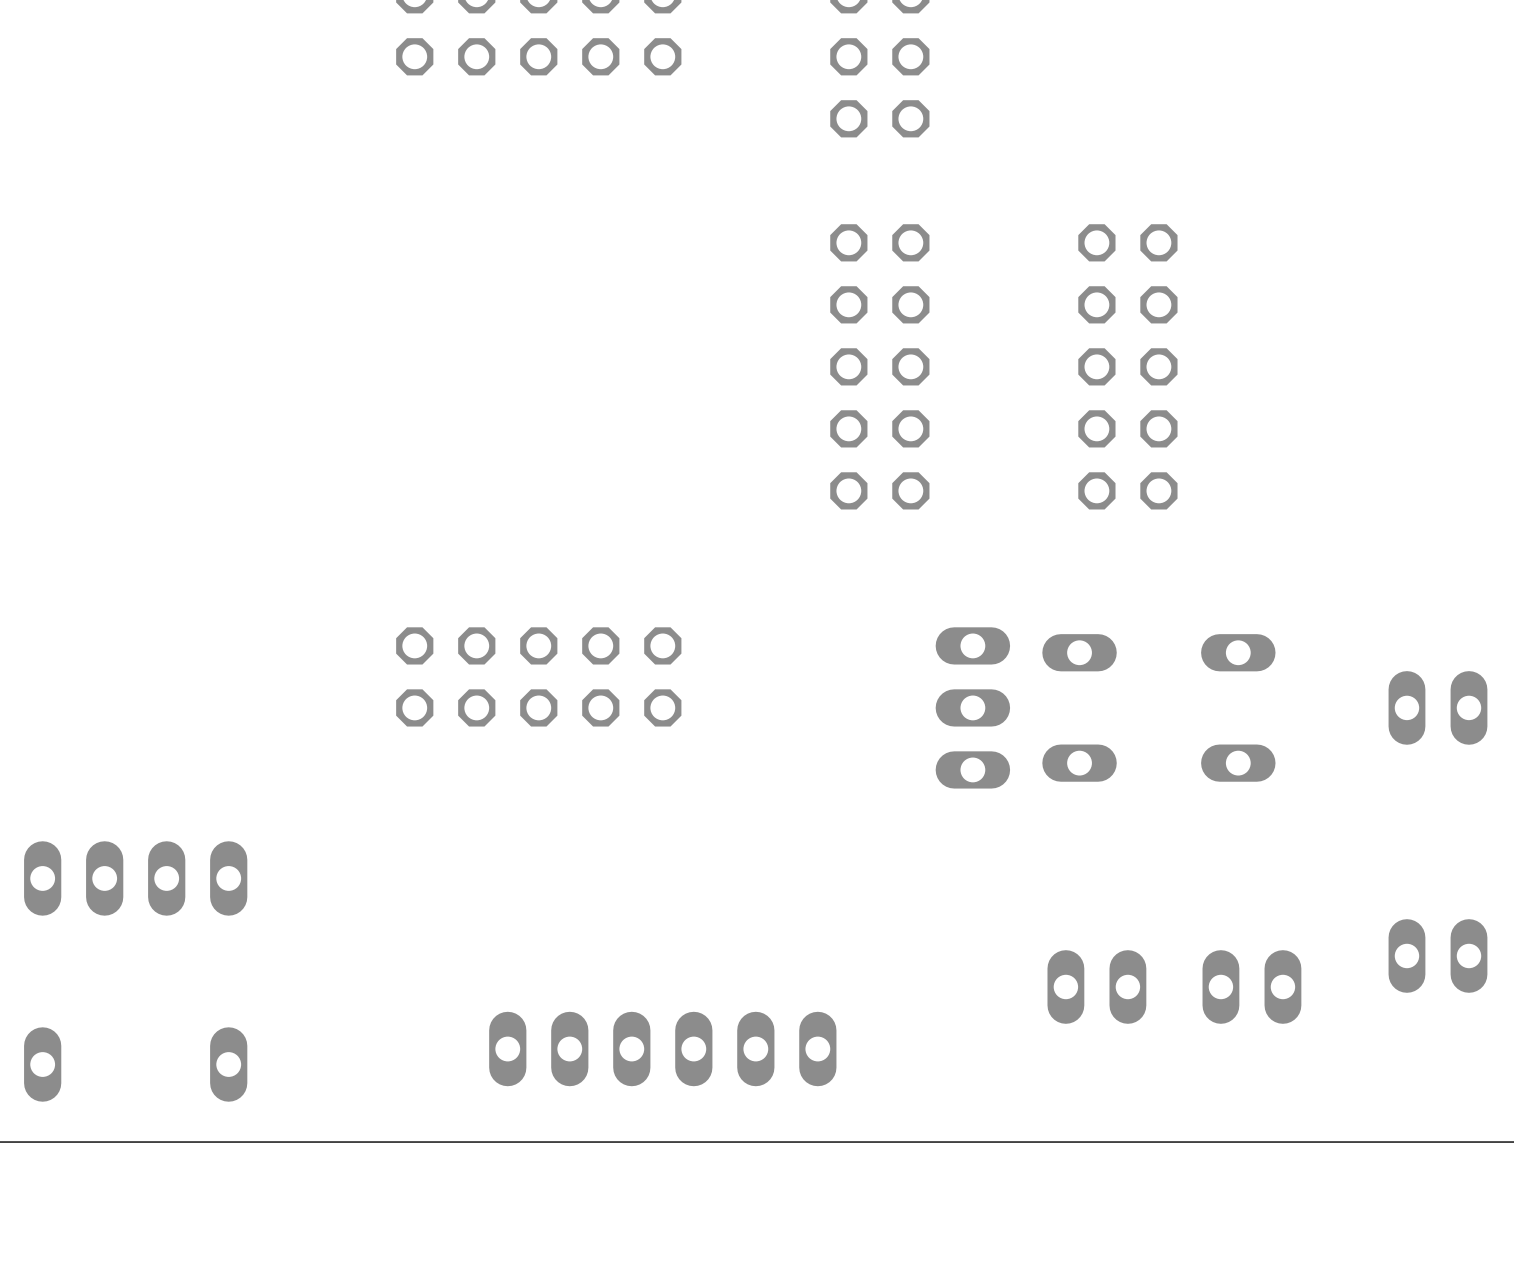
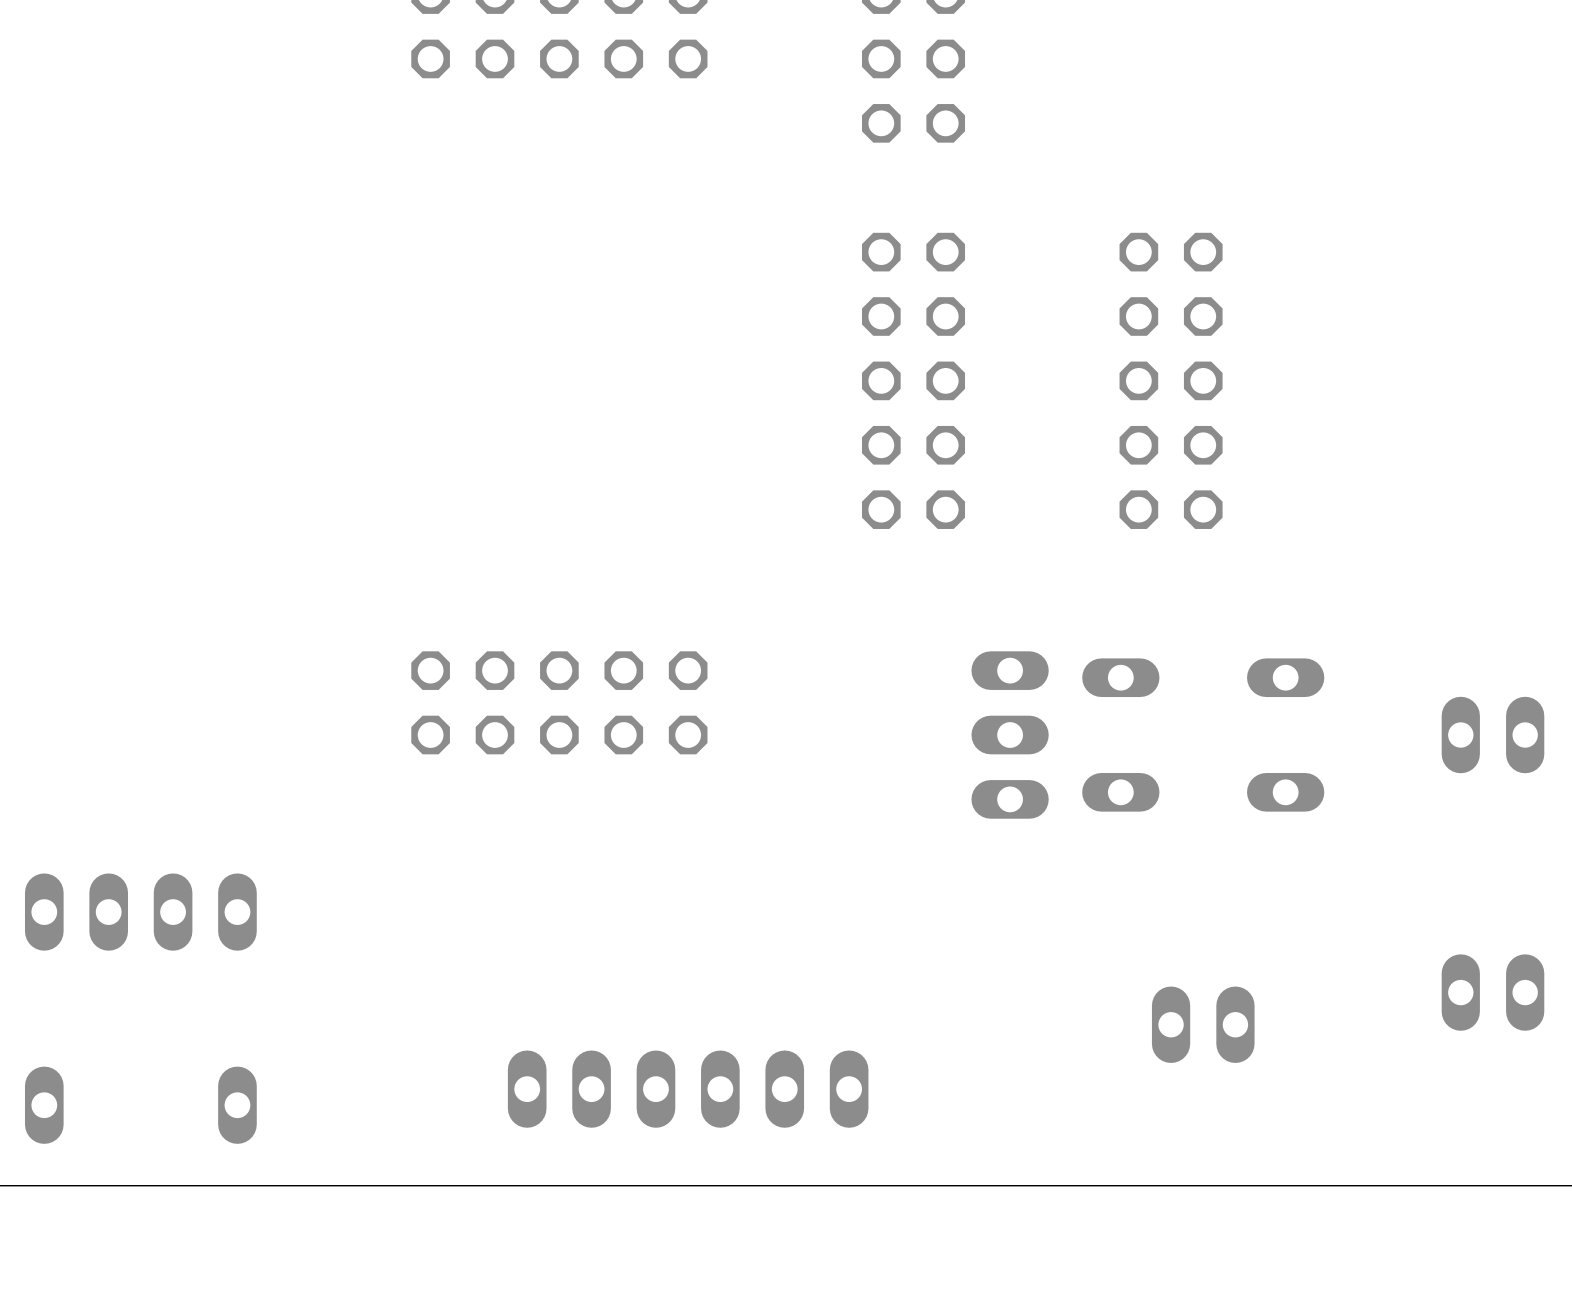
part: (1096, 986) -> none
part: none -> (1203, 1024)
part: (1251, 986) -> none

